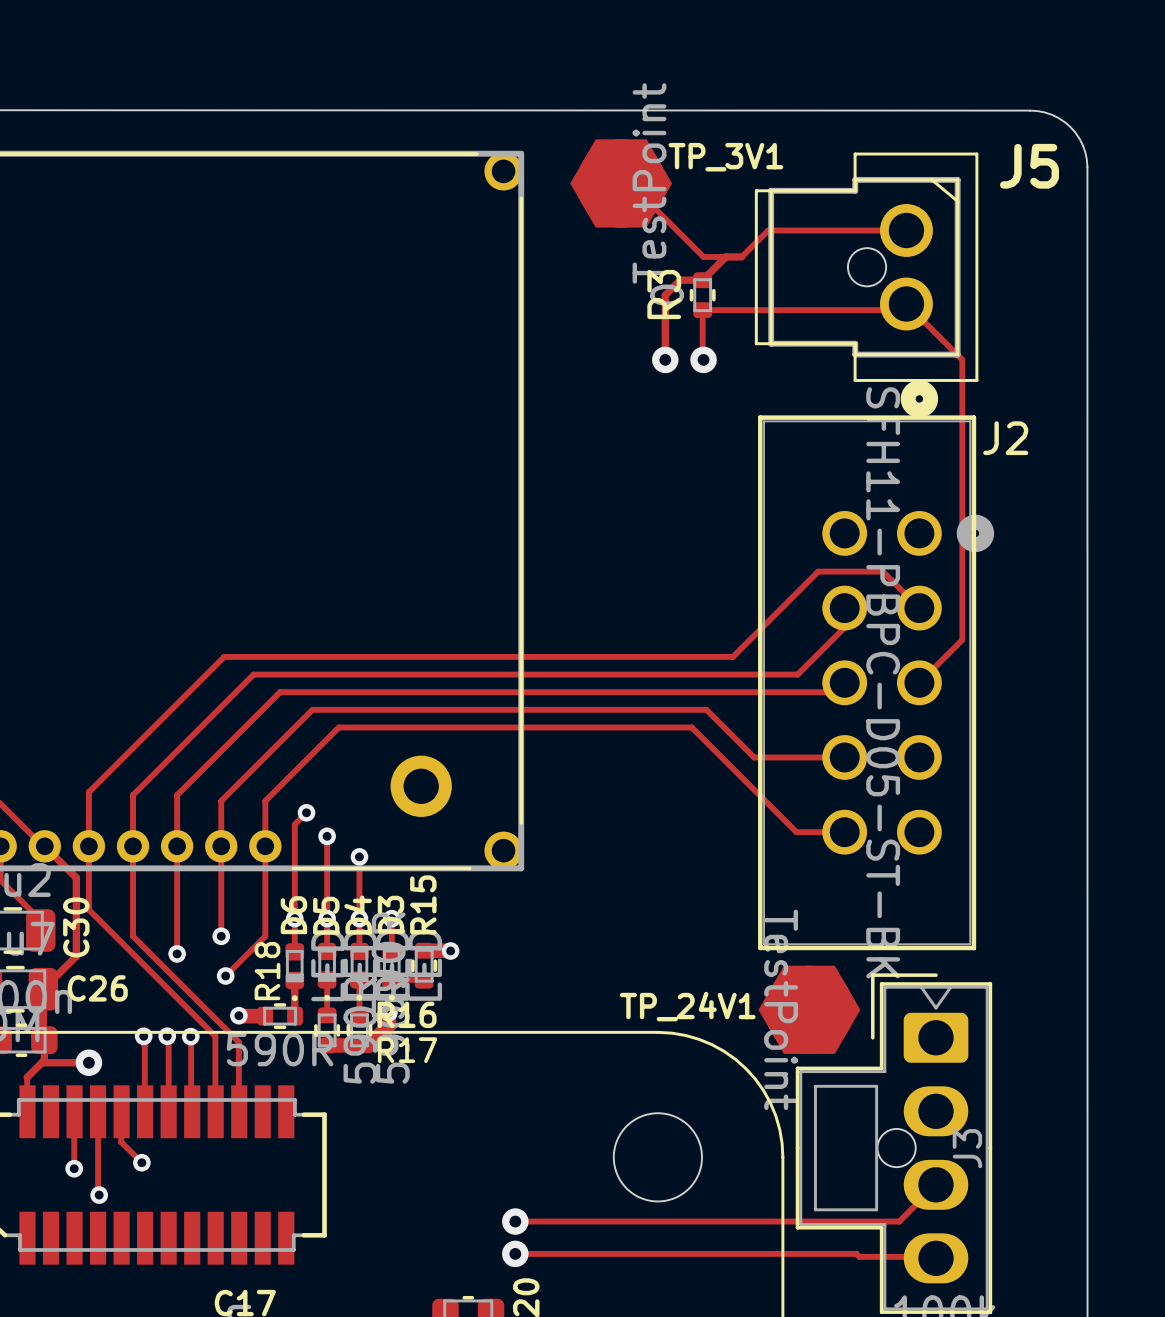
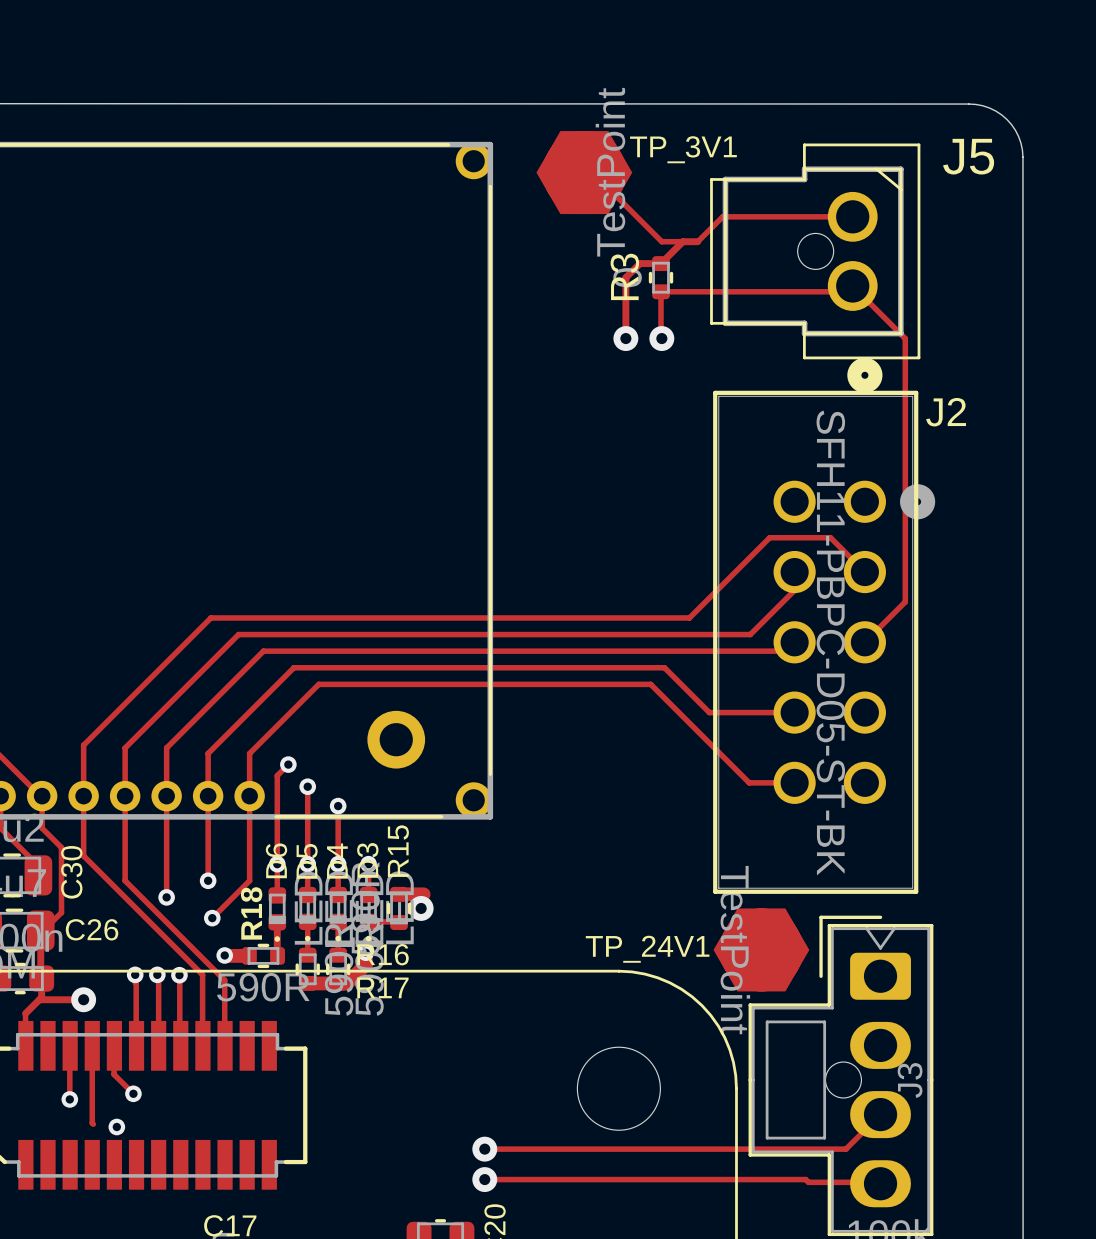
track: (44, 846) (76, 877) (76, 956) (43, 989) (43, 992) -> (42, 796) (42, 828) (61, 847) (61, 912) (40, 933)
via size: [441, 942, 460, 960] -> [408, 896, 434, 921]
via position: (99, 1195) -> (116, 1127)

